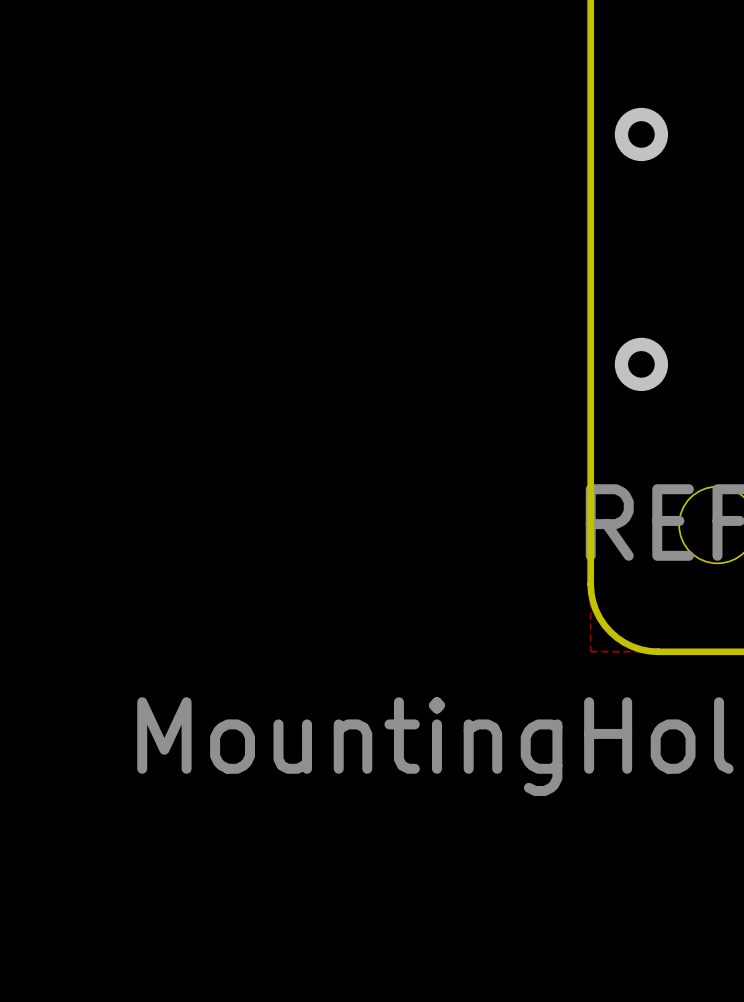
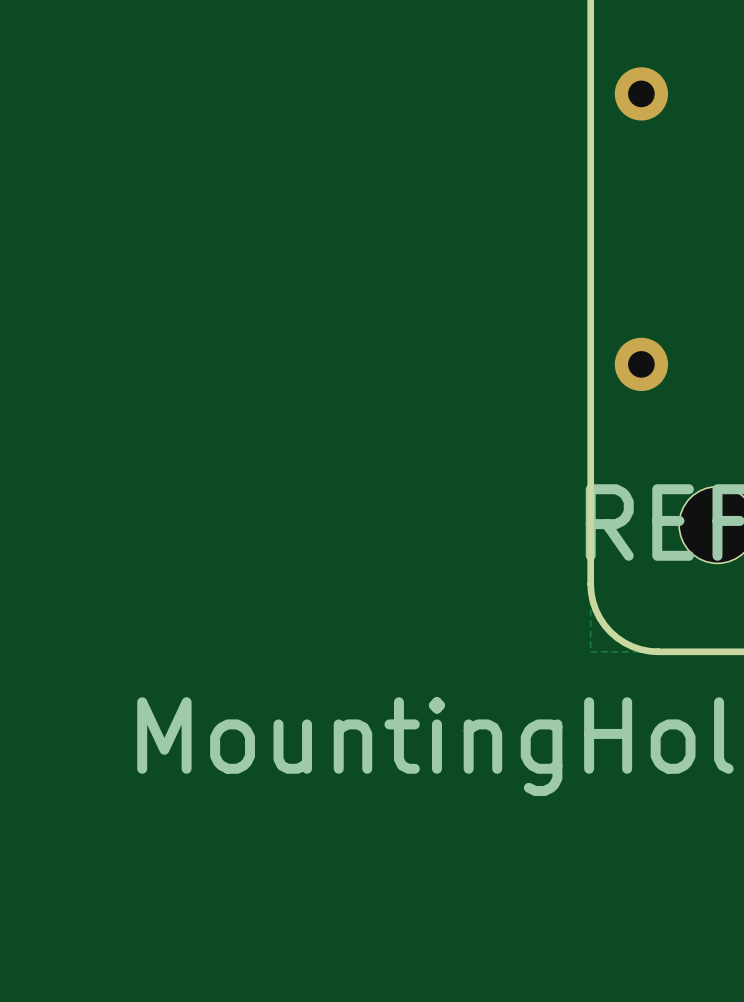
via position: (641, 134) -> (641, 93)

